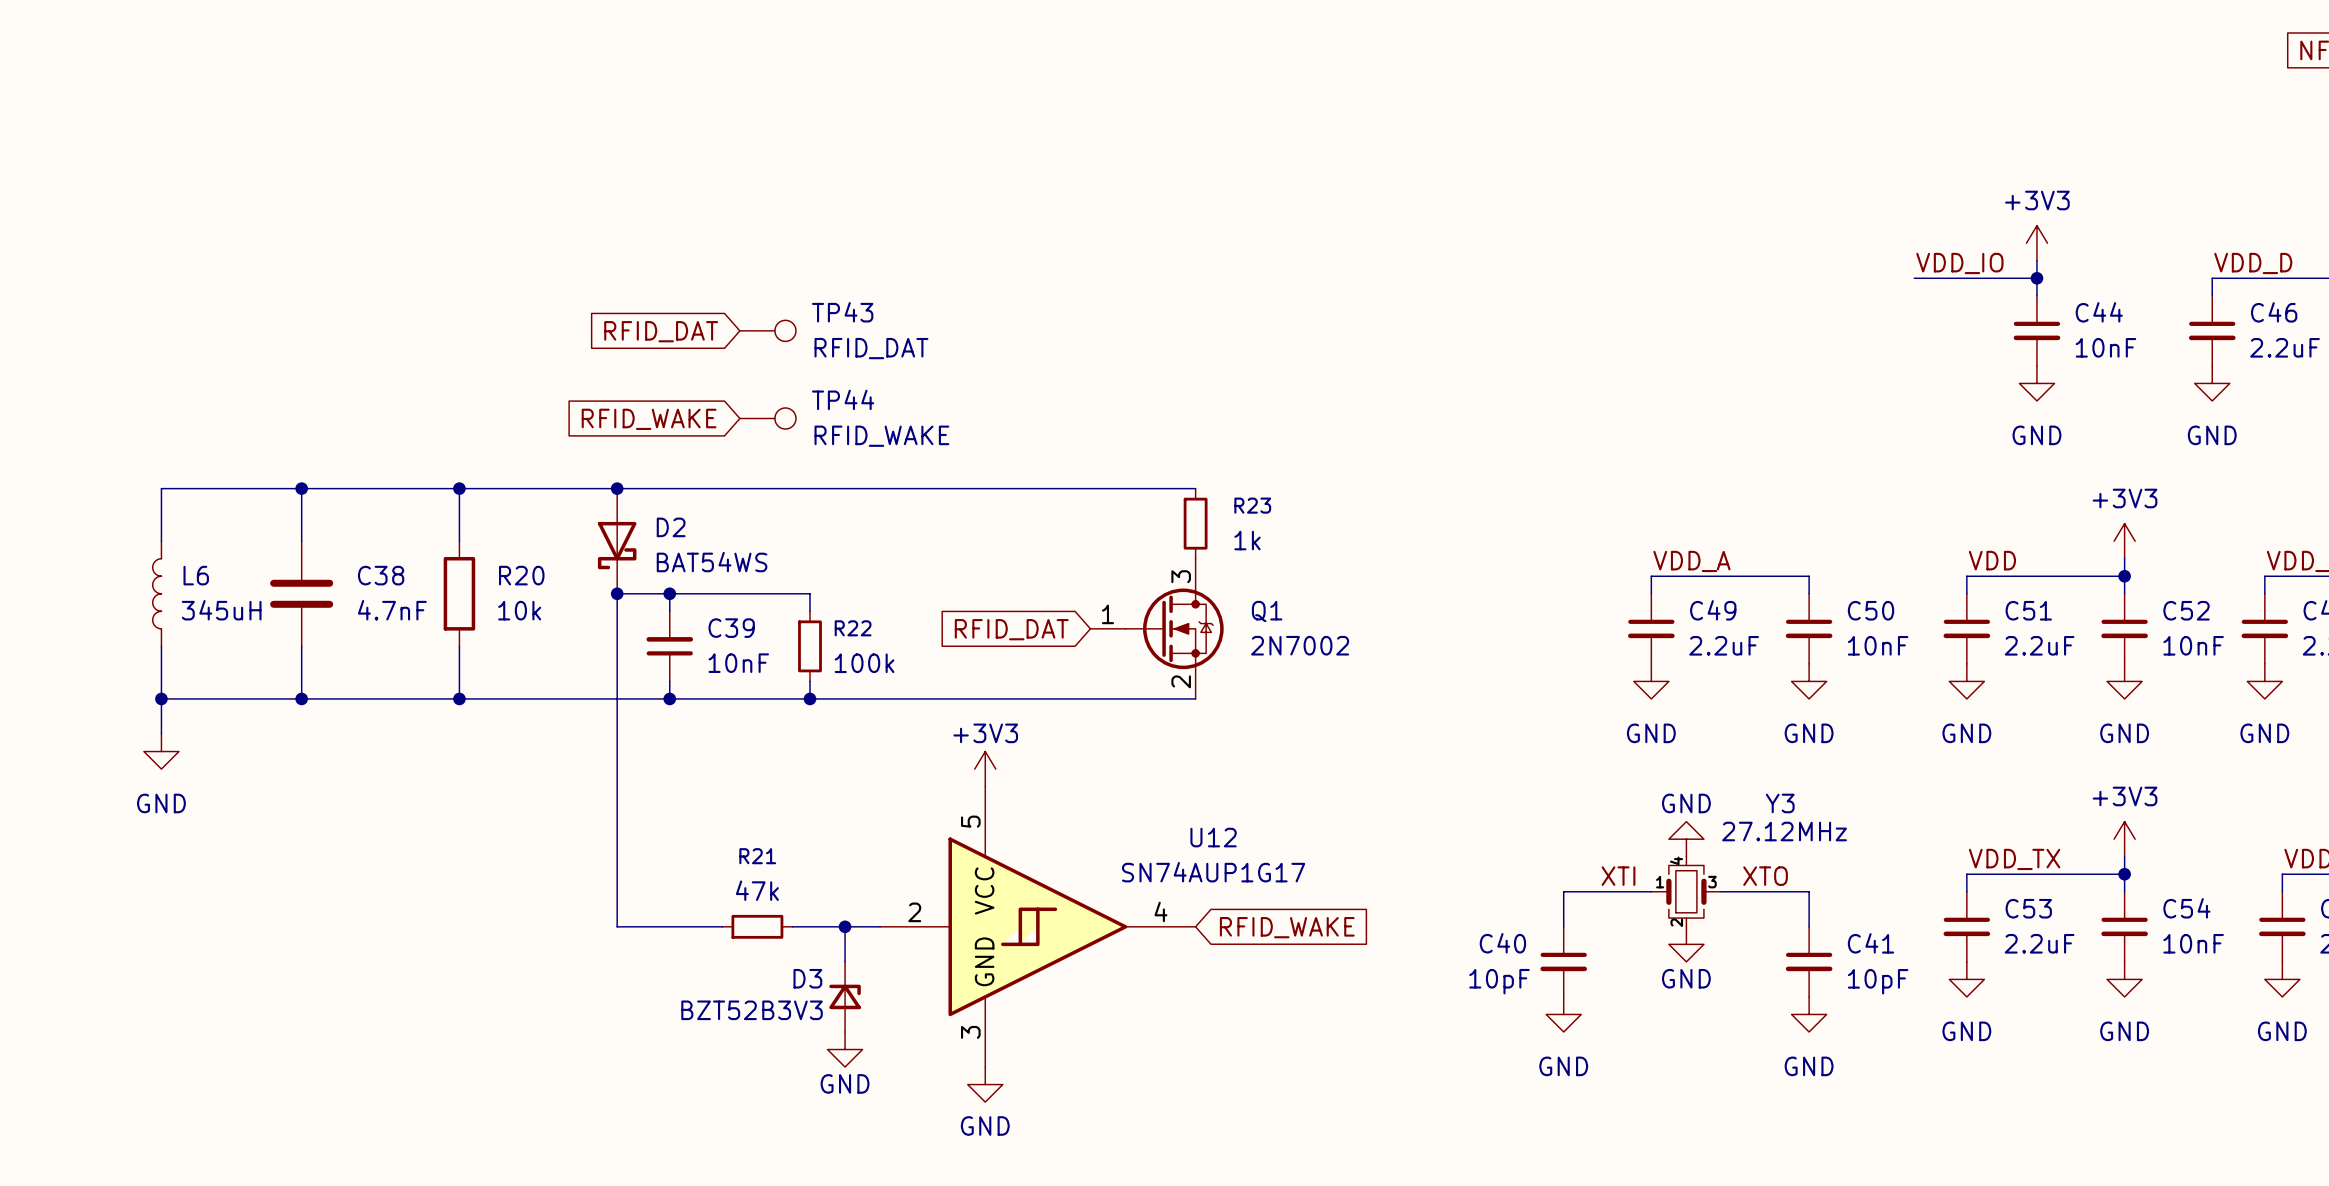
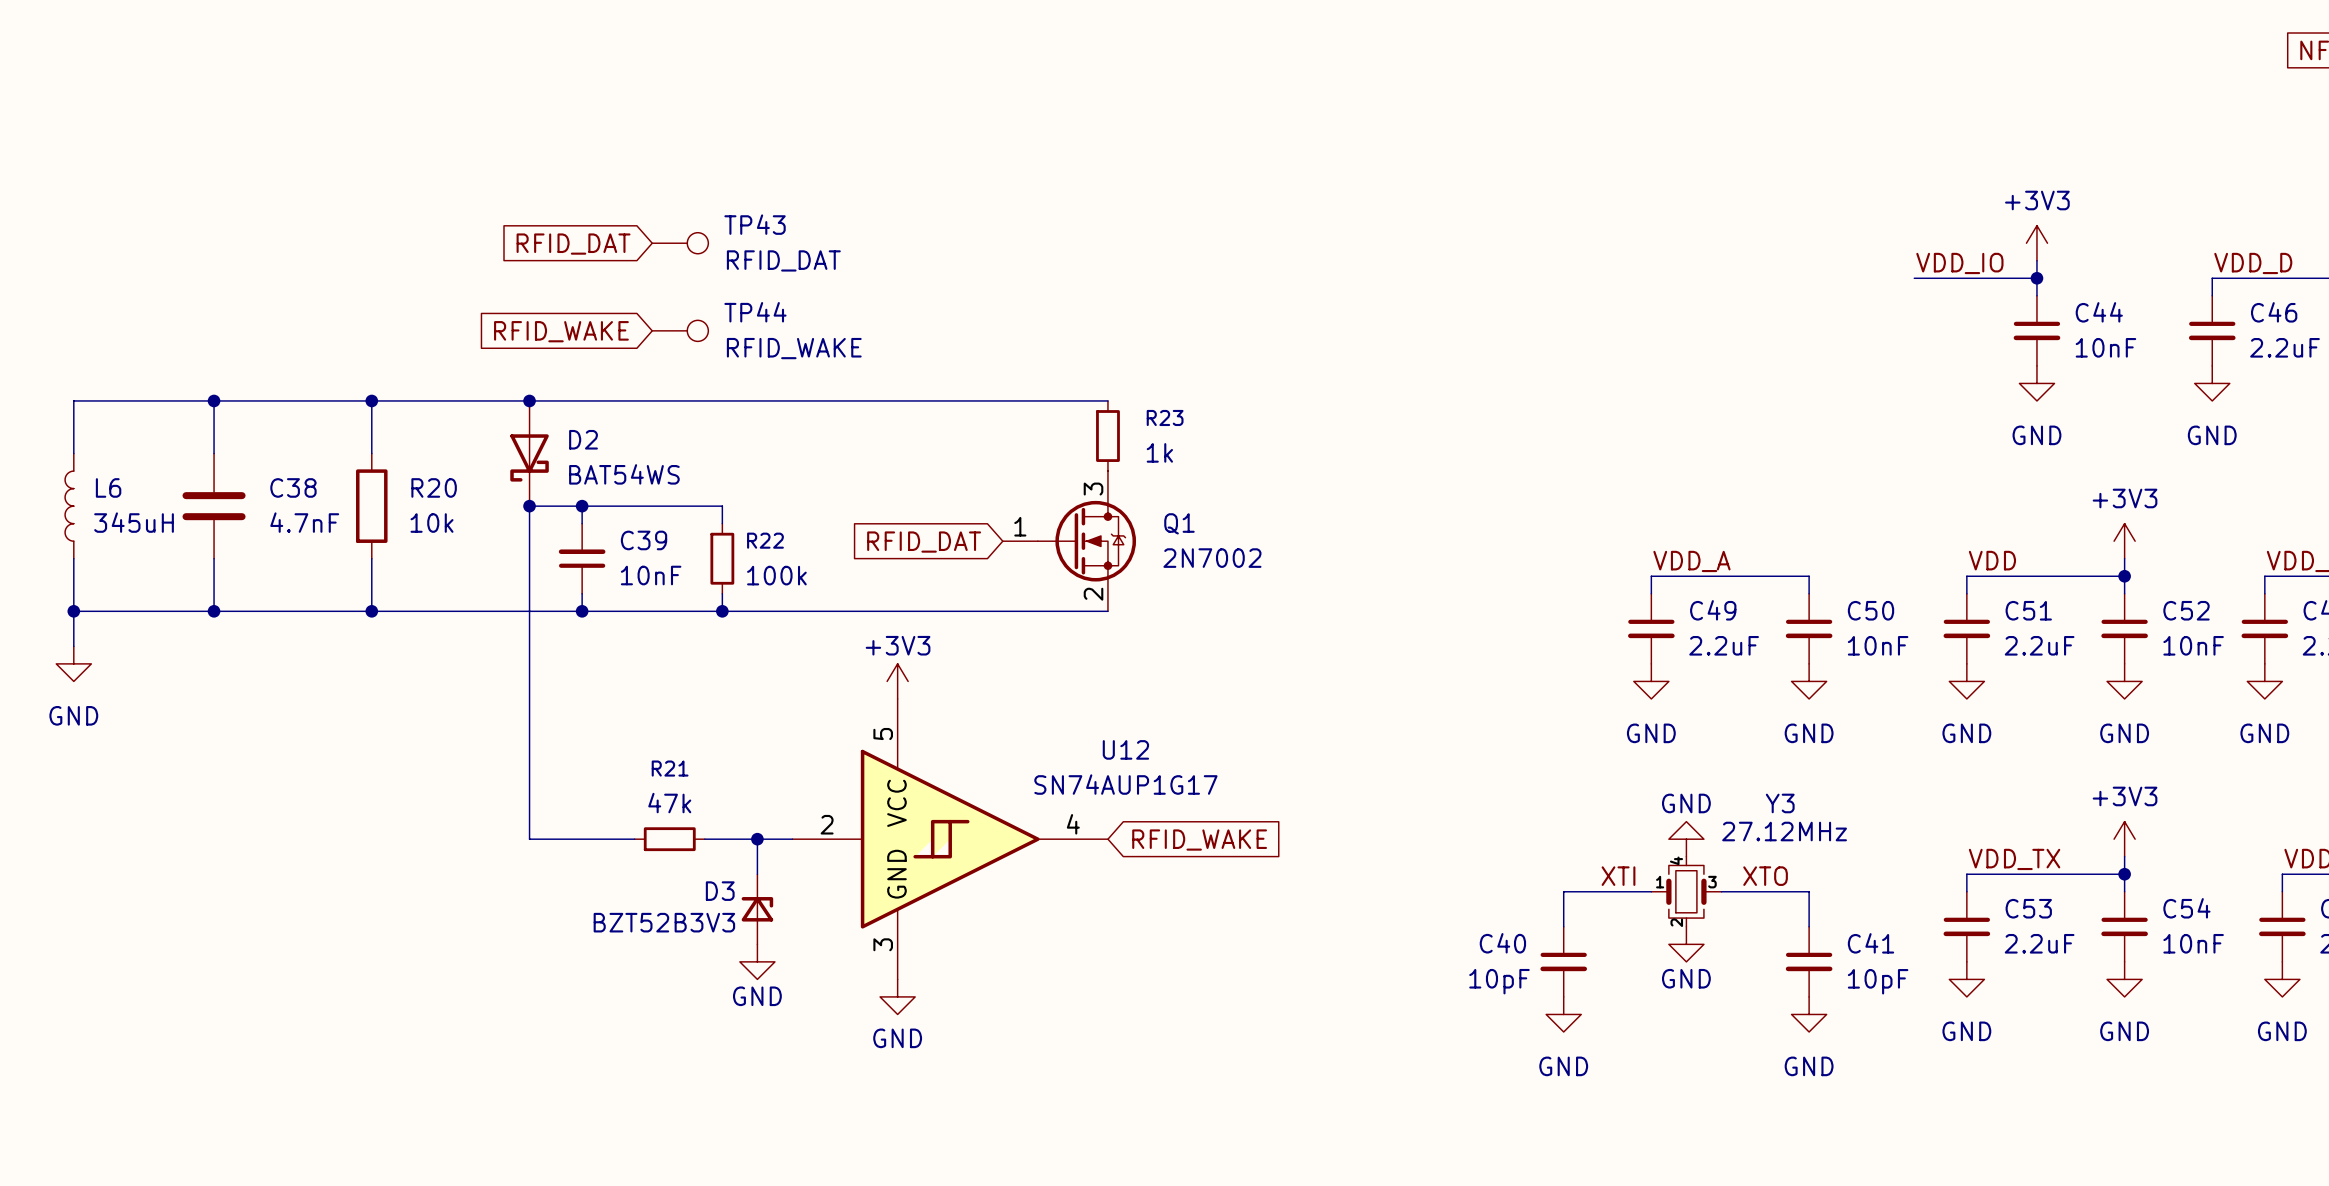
TP43 position: (767, 330) -> (680, 243)
global label position: RFID_DAT (661, 331) -> RFID_DAT (573, 244)
junction: none -> (214, 400)
junction: none -> (371, 400)
junction: none -> (529, 400)
TP44 position: (767, 418) -> (680, 330)
global label position: RFID_WAKE (649, 419) -> RFID_WAKE (561, 331)
wire: (301, 488) (301, 541) -> (214, 400) (214, 453)
junction: (301, 488) -> none
wire: (459, 488) (459, 541) -> (371, 400) (371, 453)
junction: (459, 488) -> none
junction position: (617, 488) -> (582, 506)
wire: (1195, 488) (161, 488) (161, 541) -> (1107, 400) (73, 400) (73, 453)
junction: none -> (529, 506)
R23 position: (1195, 523) -> (1107, 436)
D2 position: (617, 541) -> (529, 453)
L6 position: (157, 593) -> (69, 506)
C38 position: (301, 593) -> (214, 506)
R20 position: (459, 593) -> (371, 506)
junction position: (617, 593) -> (582, 611)
wire: (669, 593) (669, 611) -> (582, 506) (582, 523)
junction: (669, 593) -> none
junction: none -> (73, 611)
junction: none -> (214, 611)
junction: none -> (371, 611)
junction: none -> (722, 611)
wire: (809, 611) (809, 593) (617, 593) (617, 926) (722, 926) -> (722, 523) (722, 506) (529, 506) (529, 839) (634, 839)
Q1 position: (1157, 628) -> (1069, 541)
global label position: RFID_DAT (1011, 629) -> RFID_DAT (924, 542)
wire: (161, 646) (161, 734) -> (73, 558) (73, 646)
wire: (301, 646) (301, 698) -> (214, 558) (214, 611)
wire: (459, 646) (459, 698) -> (371, 558) (371, 611)
C39 position: (669, 646) -> (582, 558)
R22 position: (809, 646) -> (722, 558)
wire: (669, 681) (669, 698) -> (582, 593) (582, 611)
wire: (809, 681) (809, 698) -> (722, 593) (722, 611)
wire: (161, 698) (1195, 698) -> (73, 611) (1107, 611)
junction: (161, 698) -> none
junction: (301, 698) -> none
junction: (459, 698) -> none
junction: (669, 698) -> none
junction: (809, 698) -> none
power symbol position: GND (161, 751) -> GND (73, 663)
power symbol position: +3V3 (985, 769) -> +3V3 (897, 681)
junction: none -> (757, 839)
R21 position: (757, 926) -> (669, 839)
wire: (792, 926) (880, 926) -> (704, 839) (792, 839)
wire: (845, 926) (845, 961) -> (757, 839) (757, 874)
junction: (845, 926) -> none
U12 position: (1037, 926) -> (950, 839)
global label position: RFID_WAKE (1287, 927) -> RFID_WAKE (1199, 840)
power symbol: none -> GND (757, 961)
D3 position: (845, 996) -> (757, 909)
power symbol: none -> GND (897, 996)
power symbol: GND (845, 1049) -> none
power symbol: GND (985, 1084) -> none

